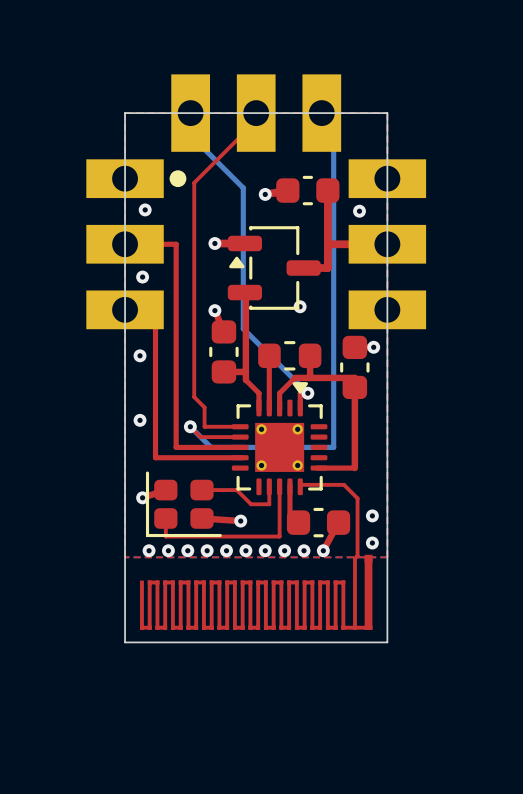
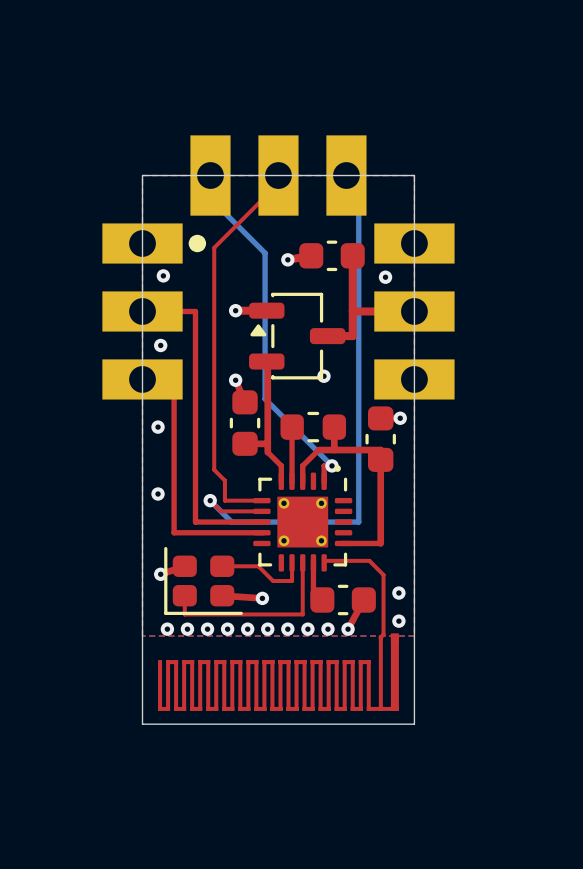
part footprint: [231, 382, 328, 496] -> [253, 465, 353, 572]

